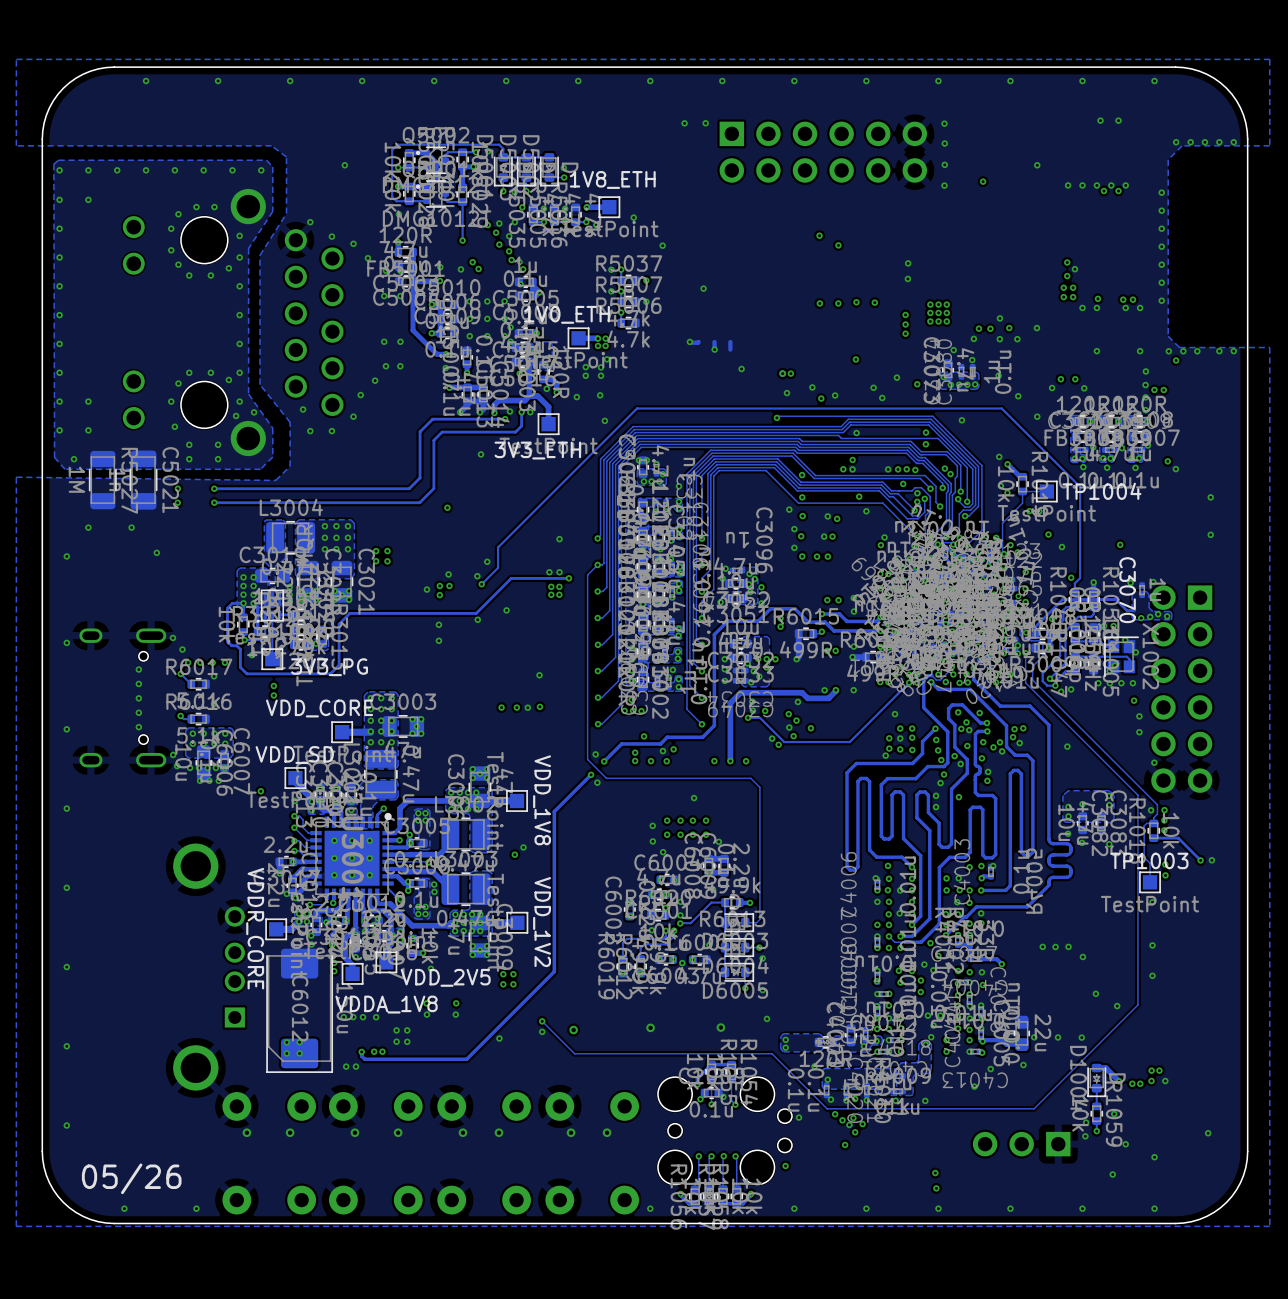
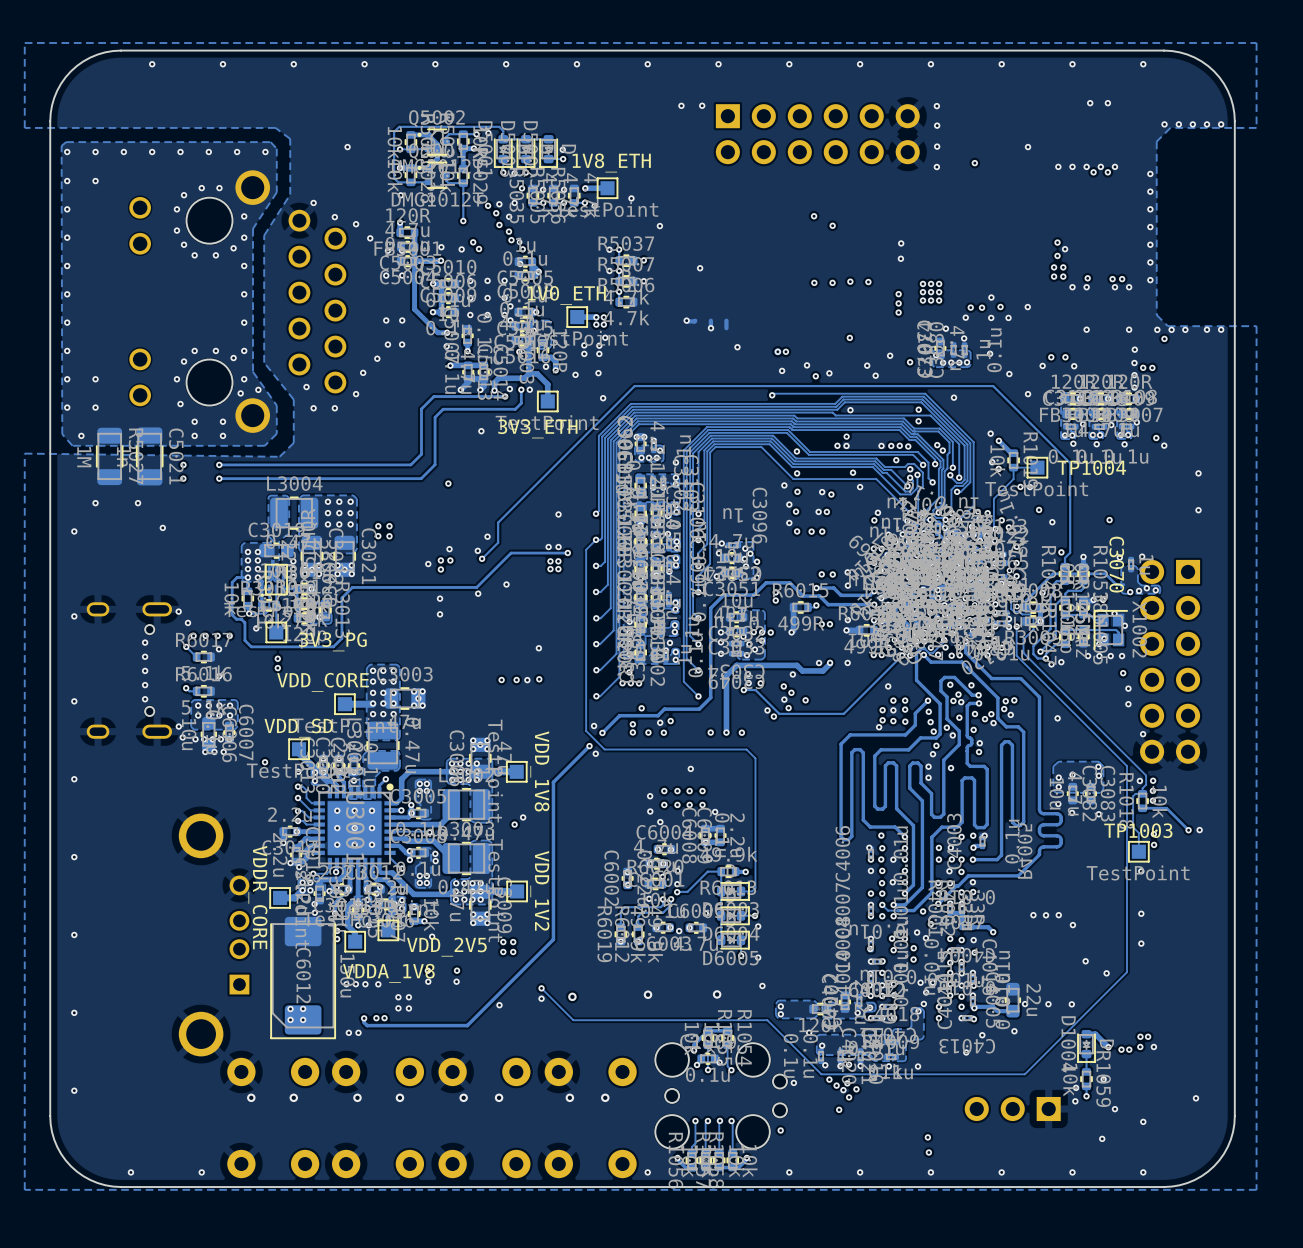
text: 05/26 (131, 1178) -> none

